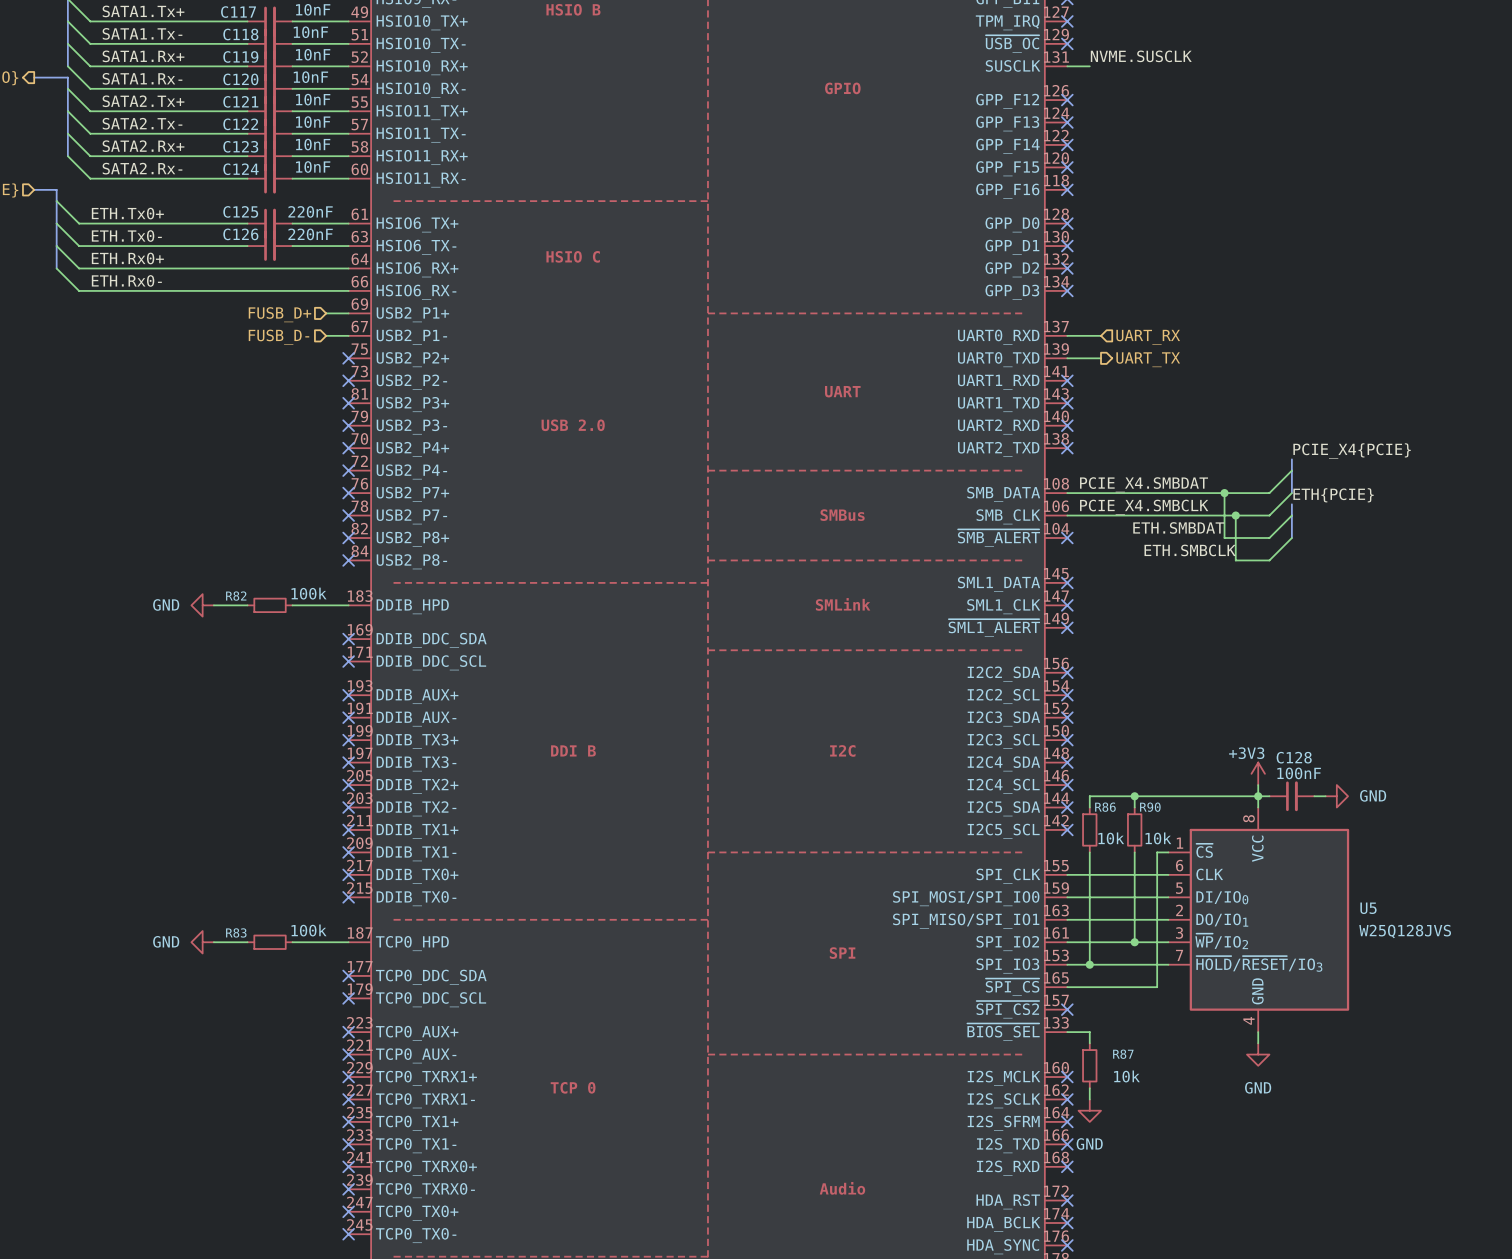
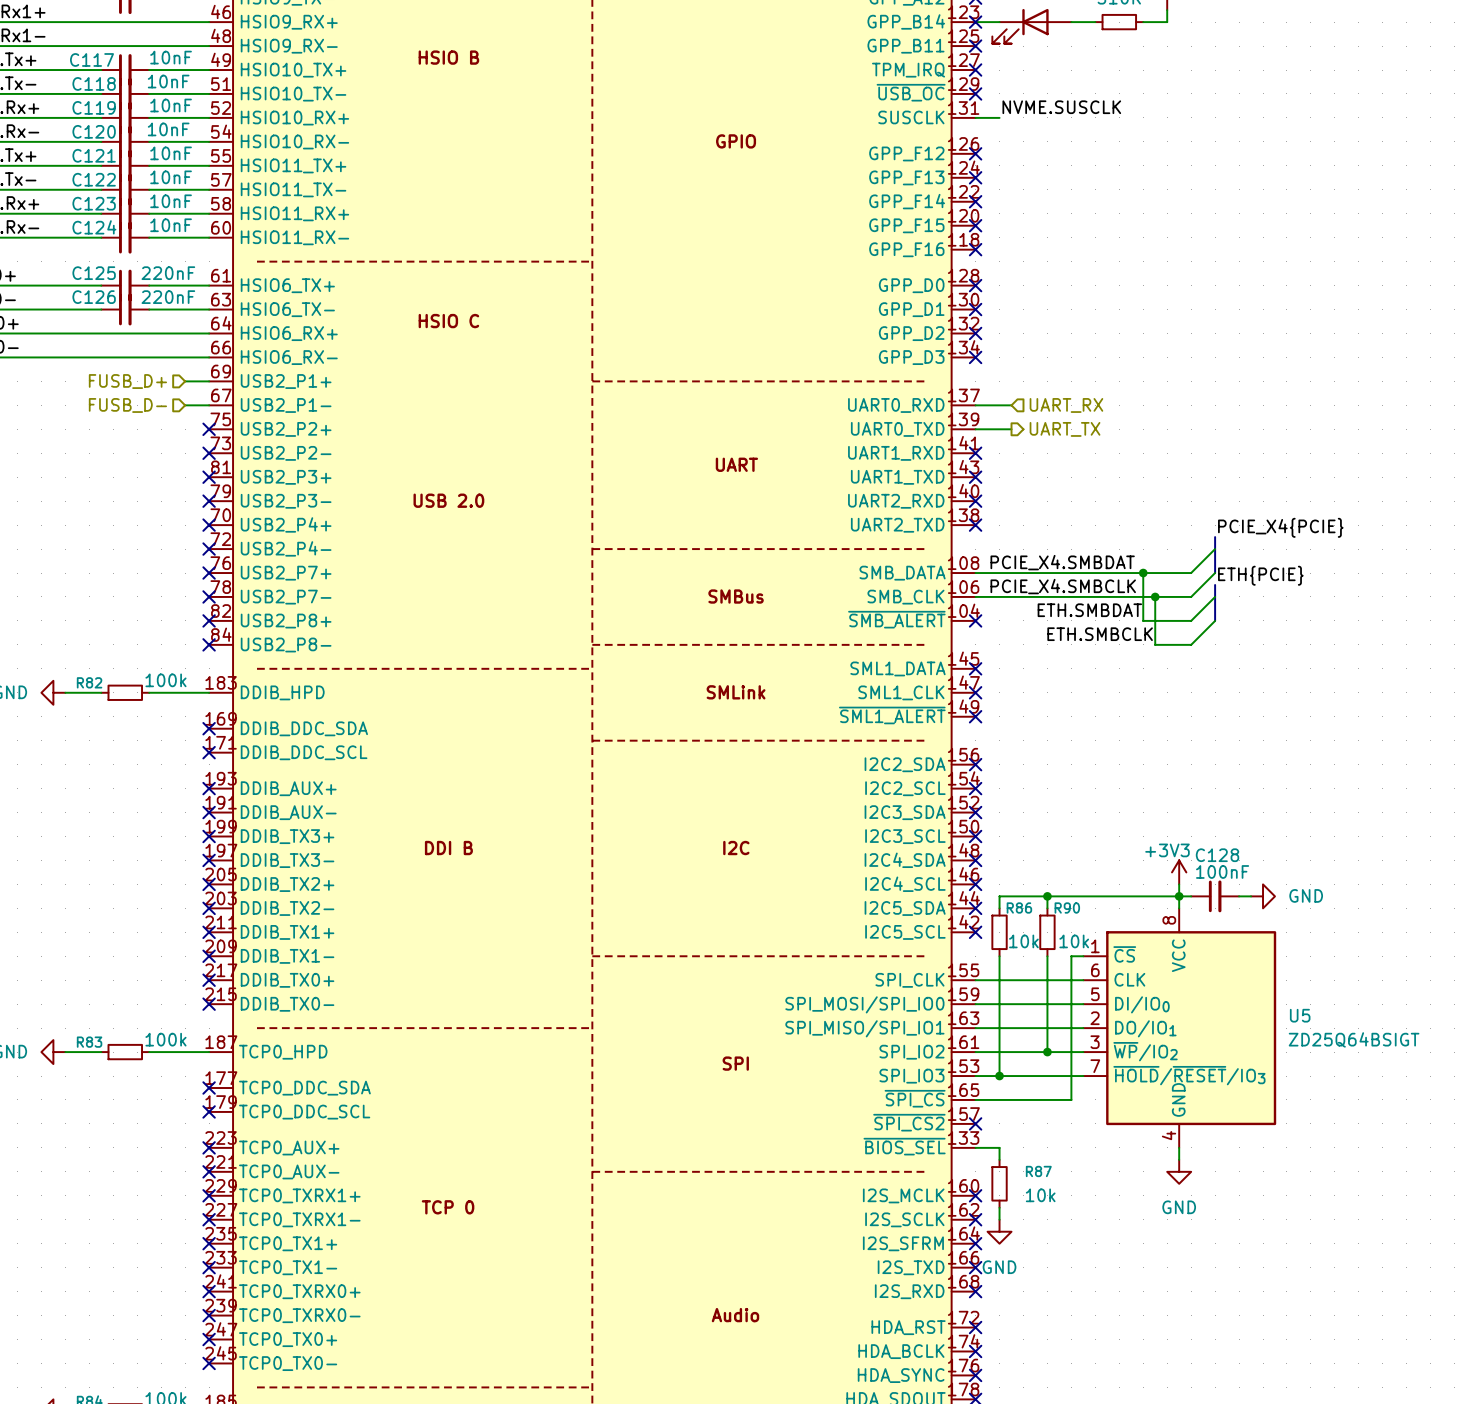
U5 value: W25Q128JVS (1405, 931) -> ZD25Q64BSIGT (1354, 1039)

